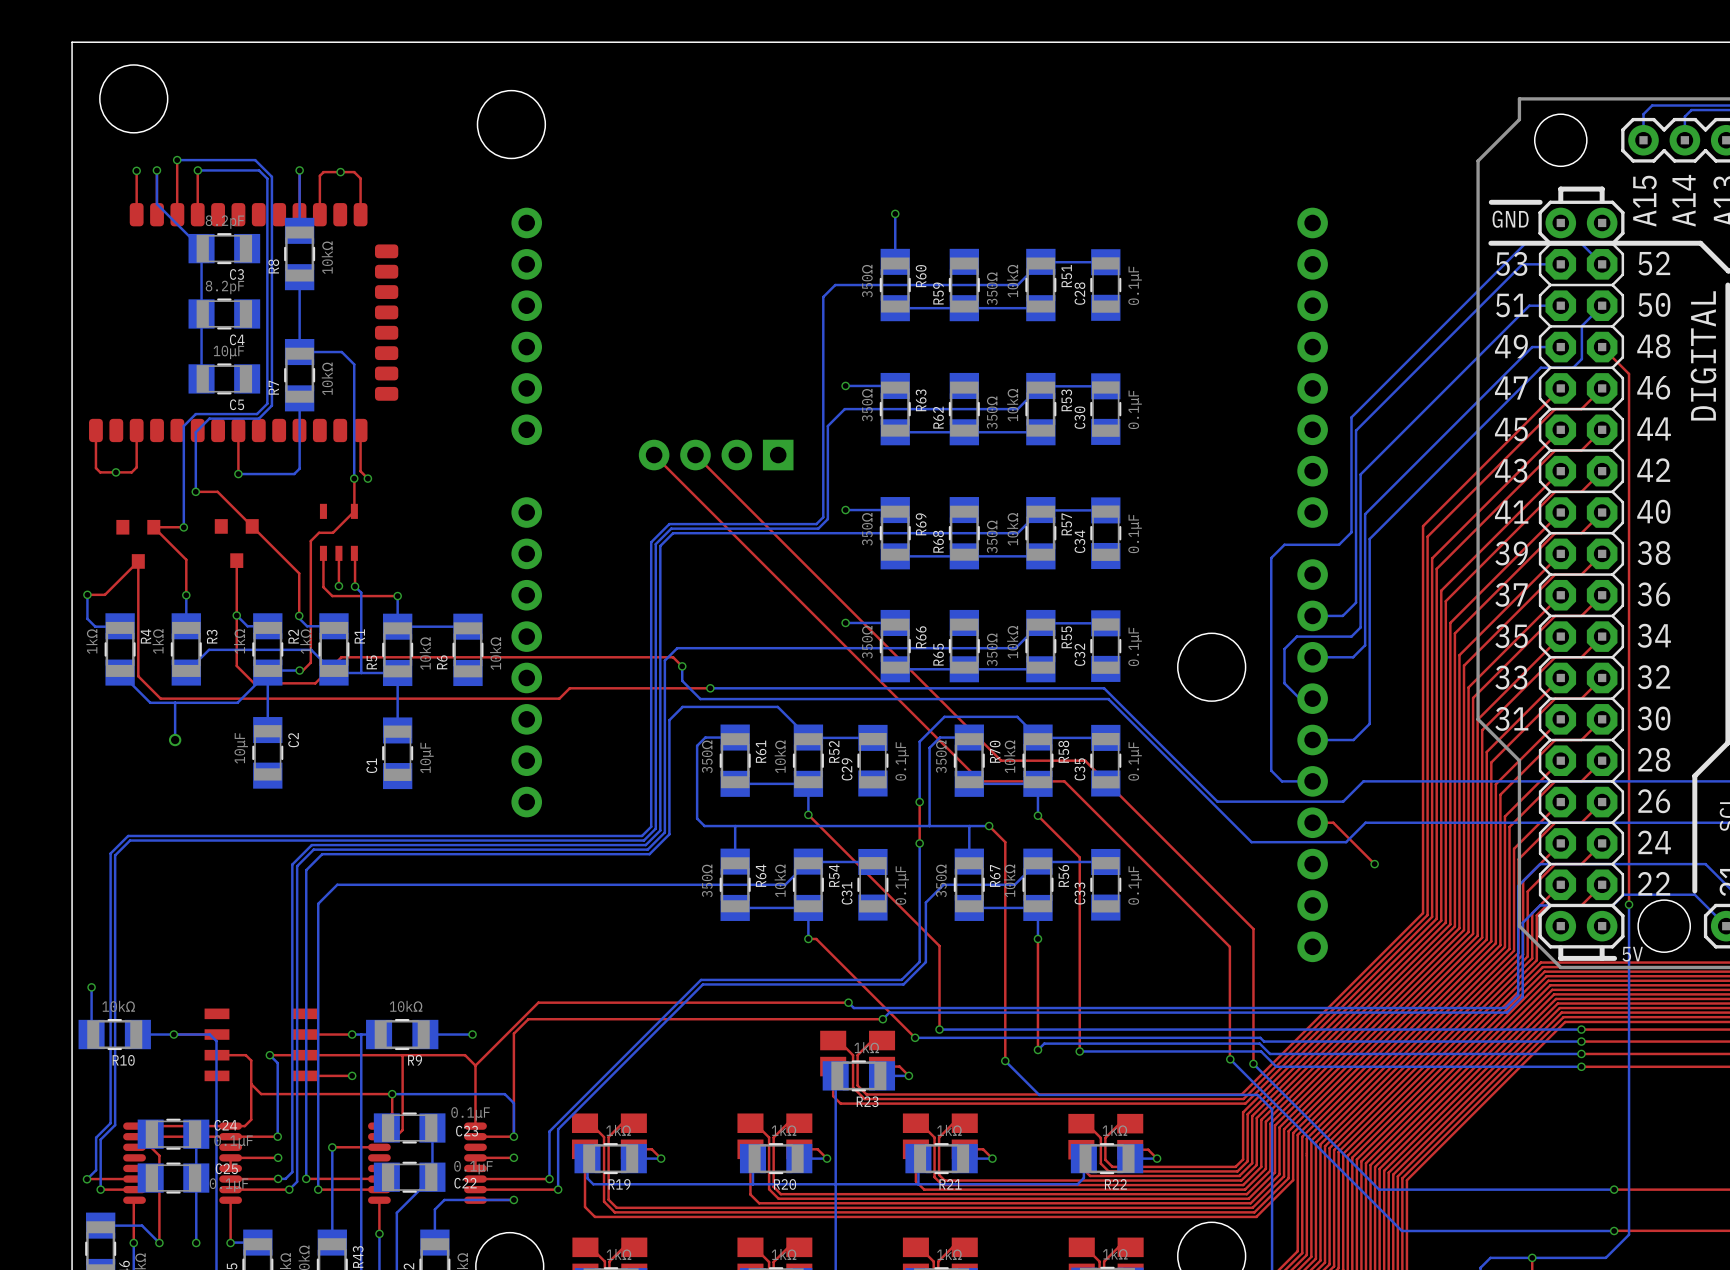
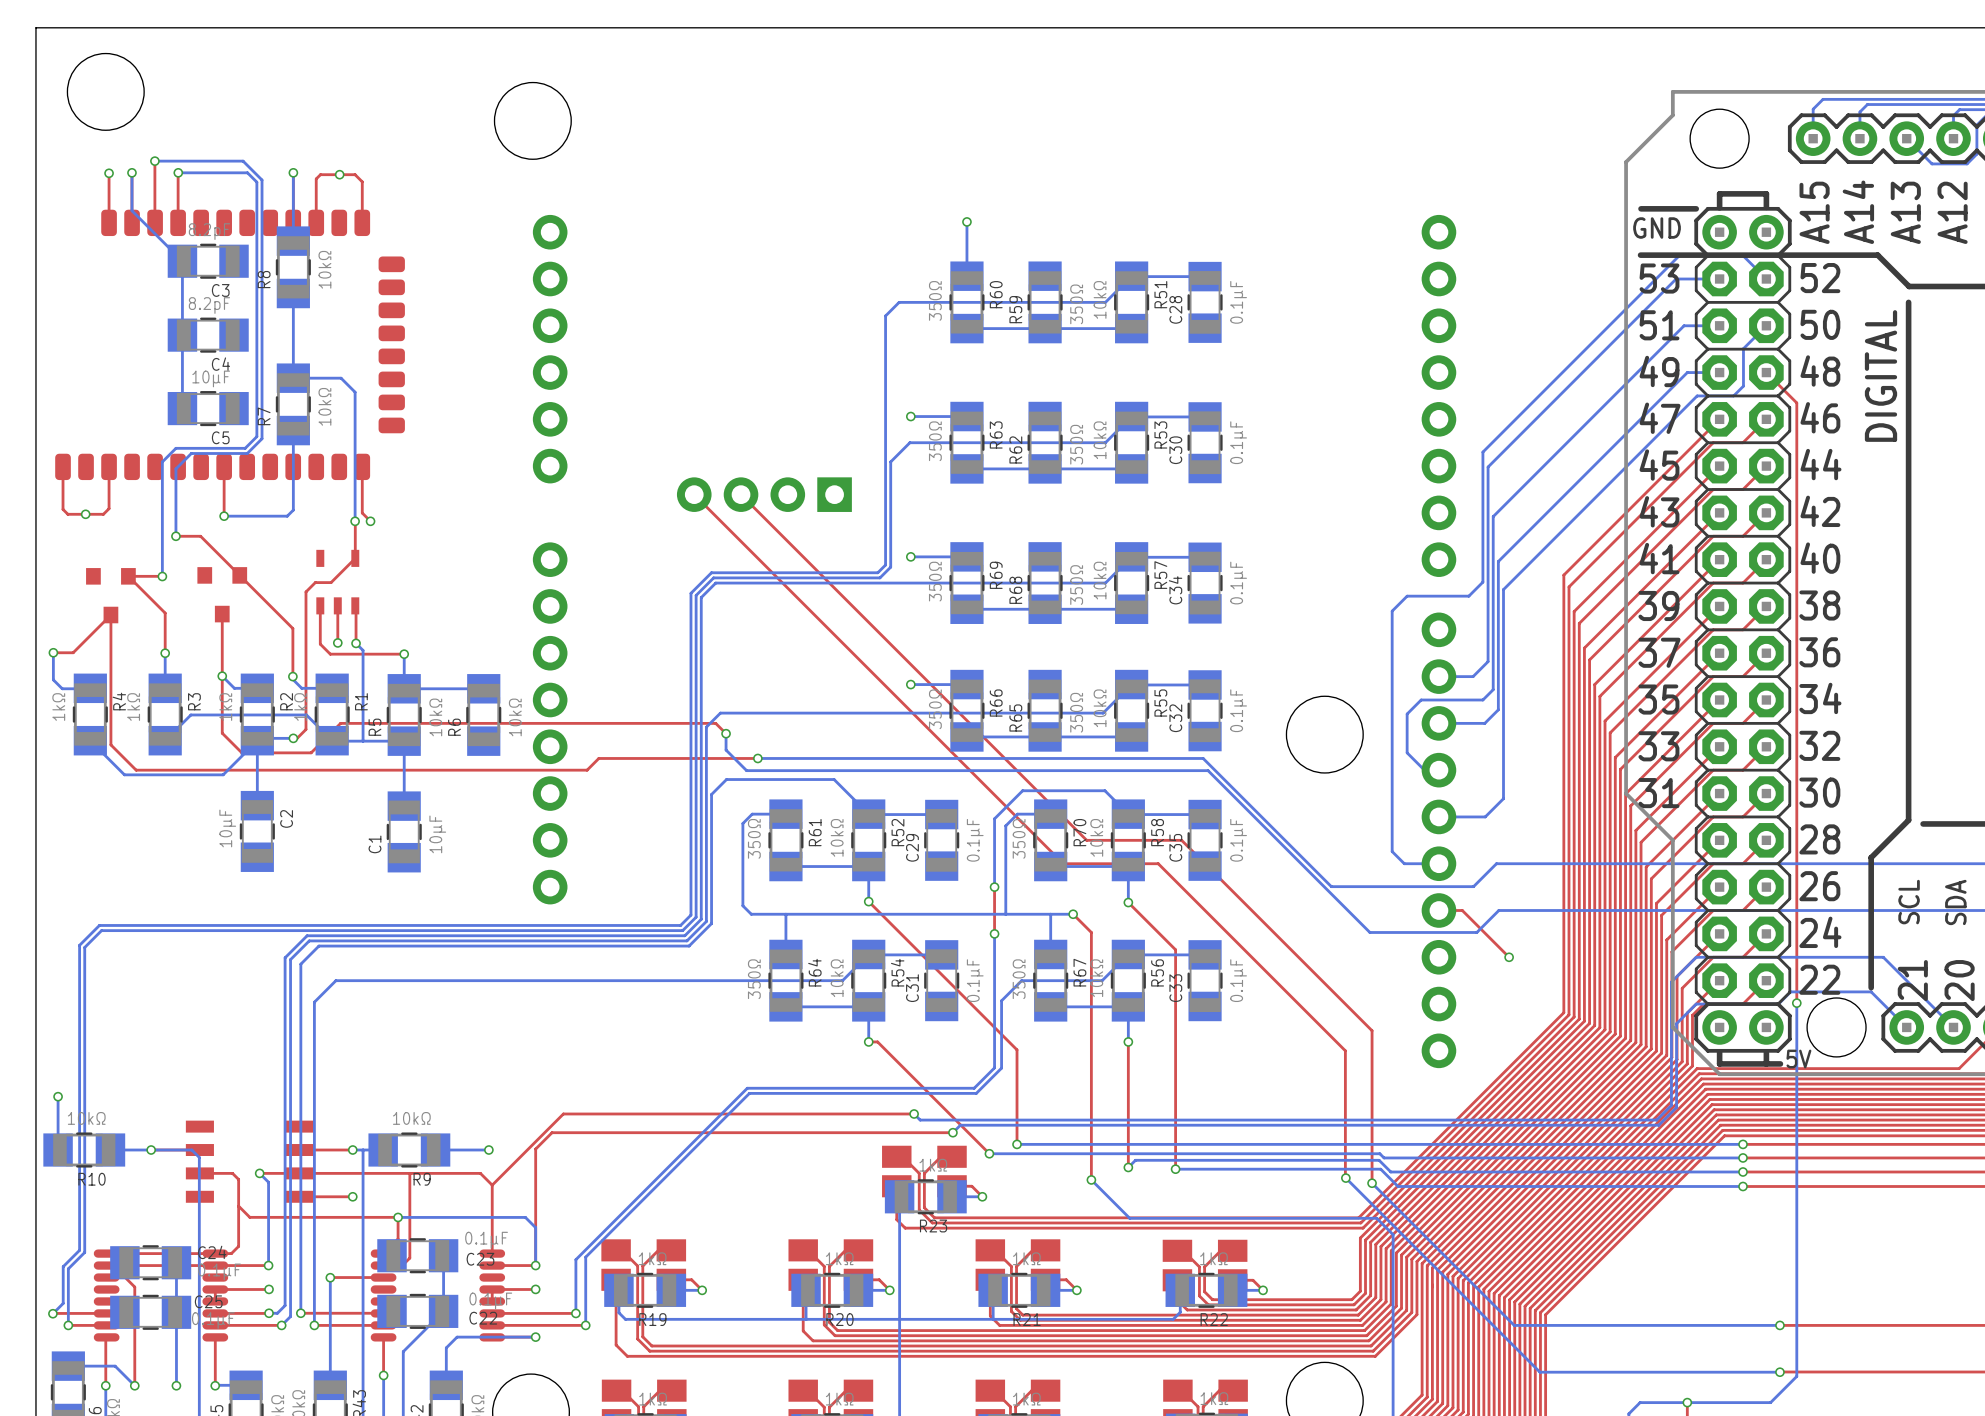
bottom track: (175, 702) (175, 740) -> none
via: (175, 740) -> none

